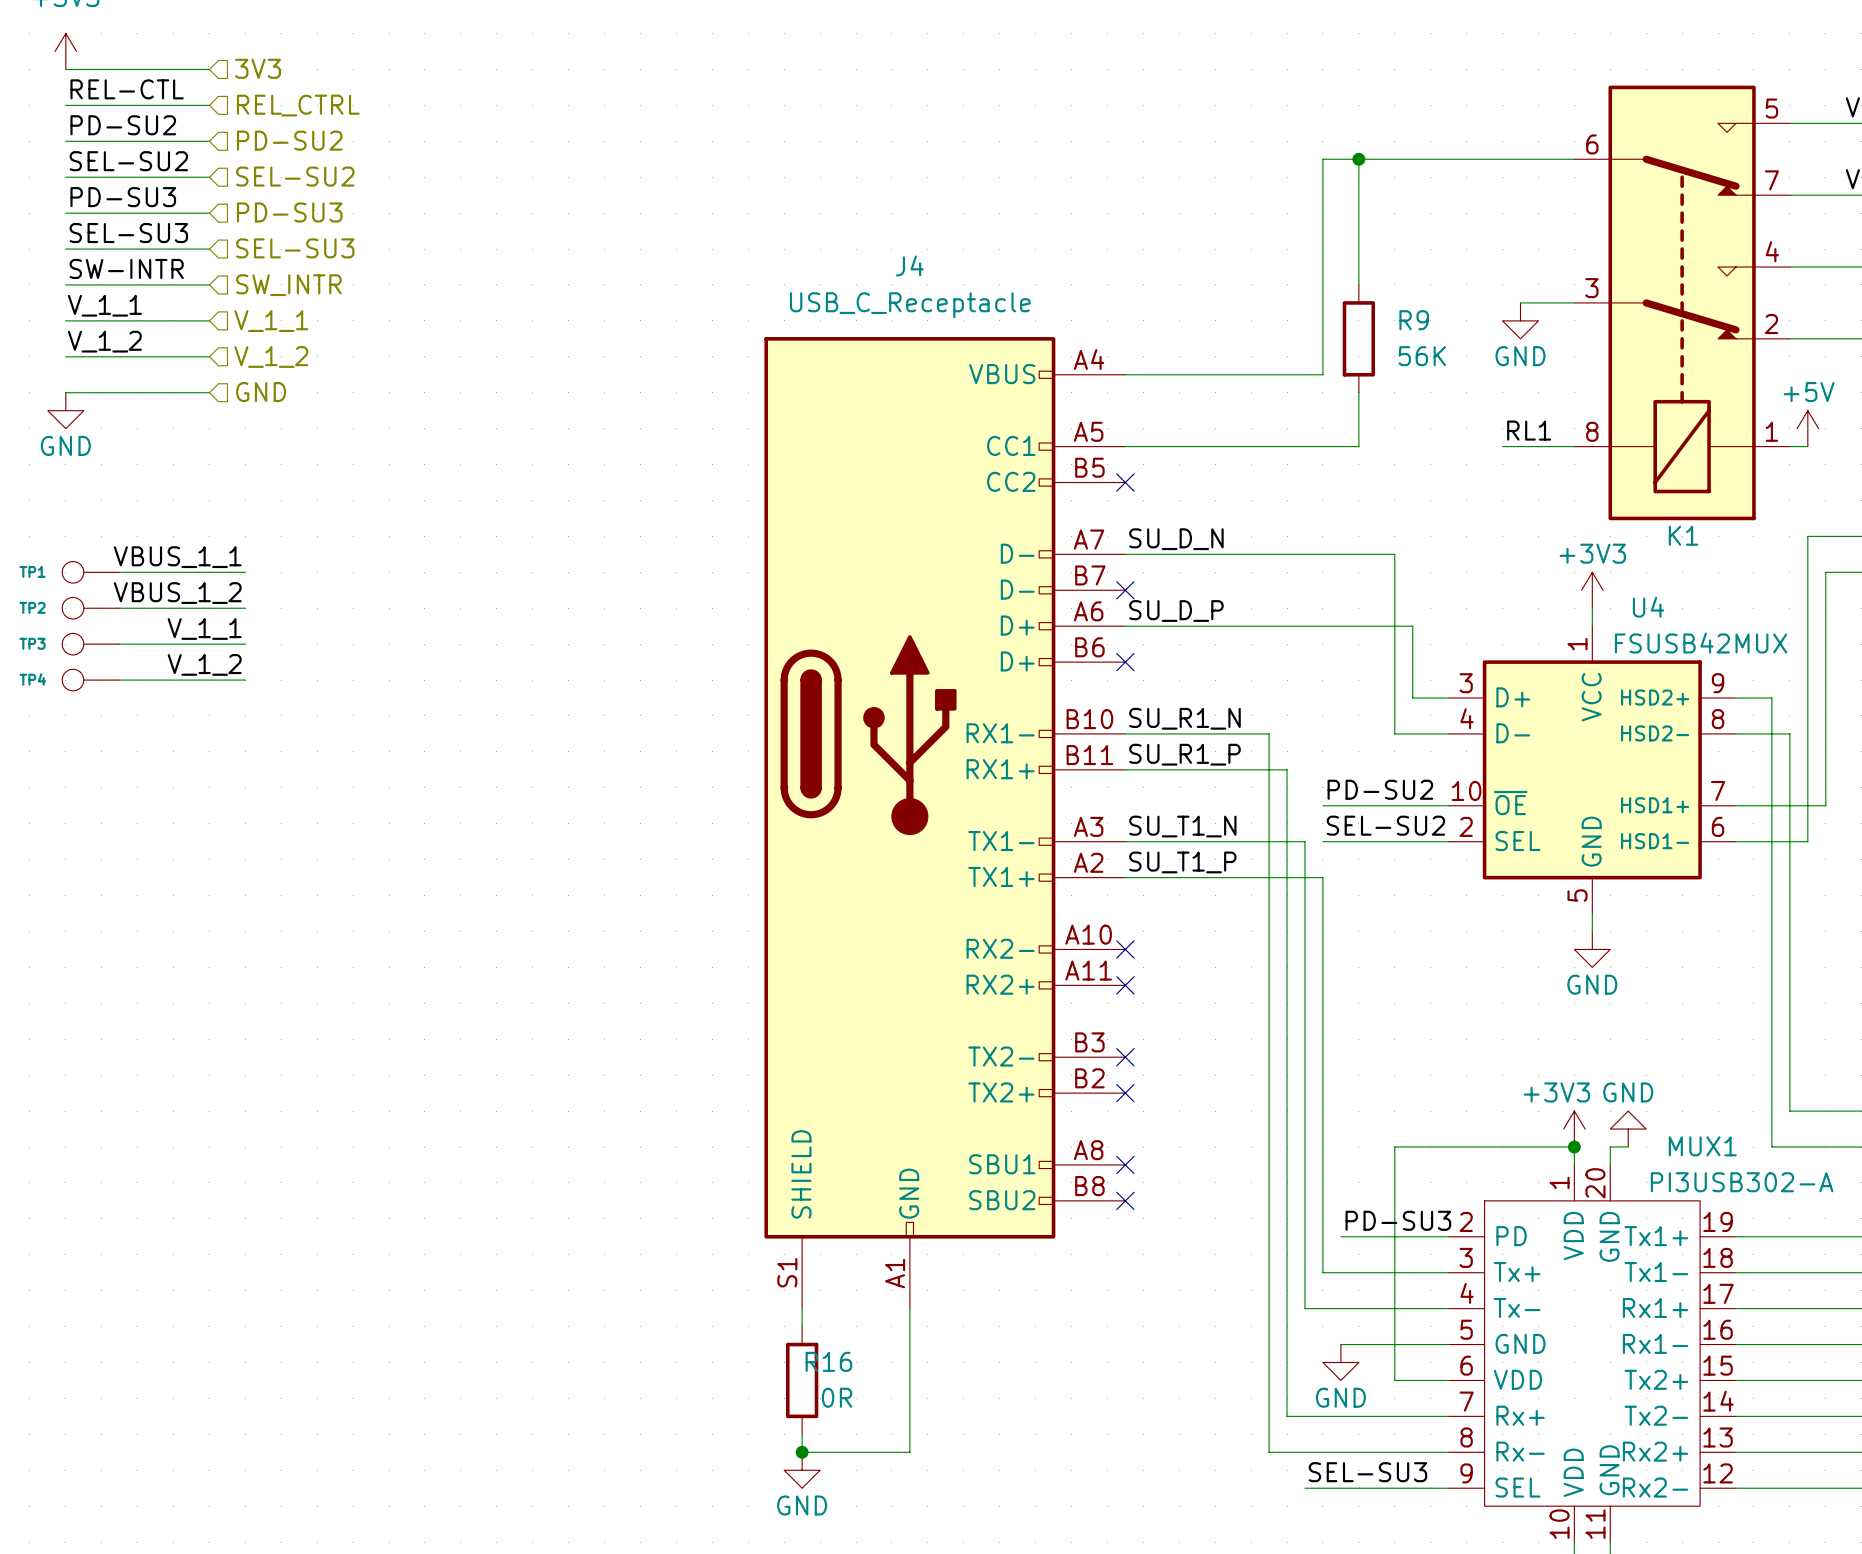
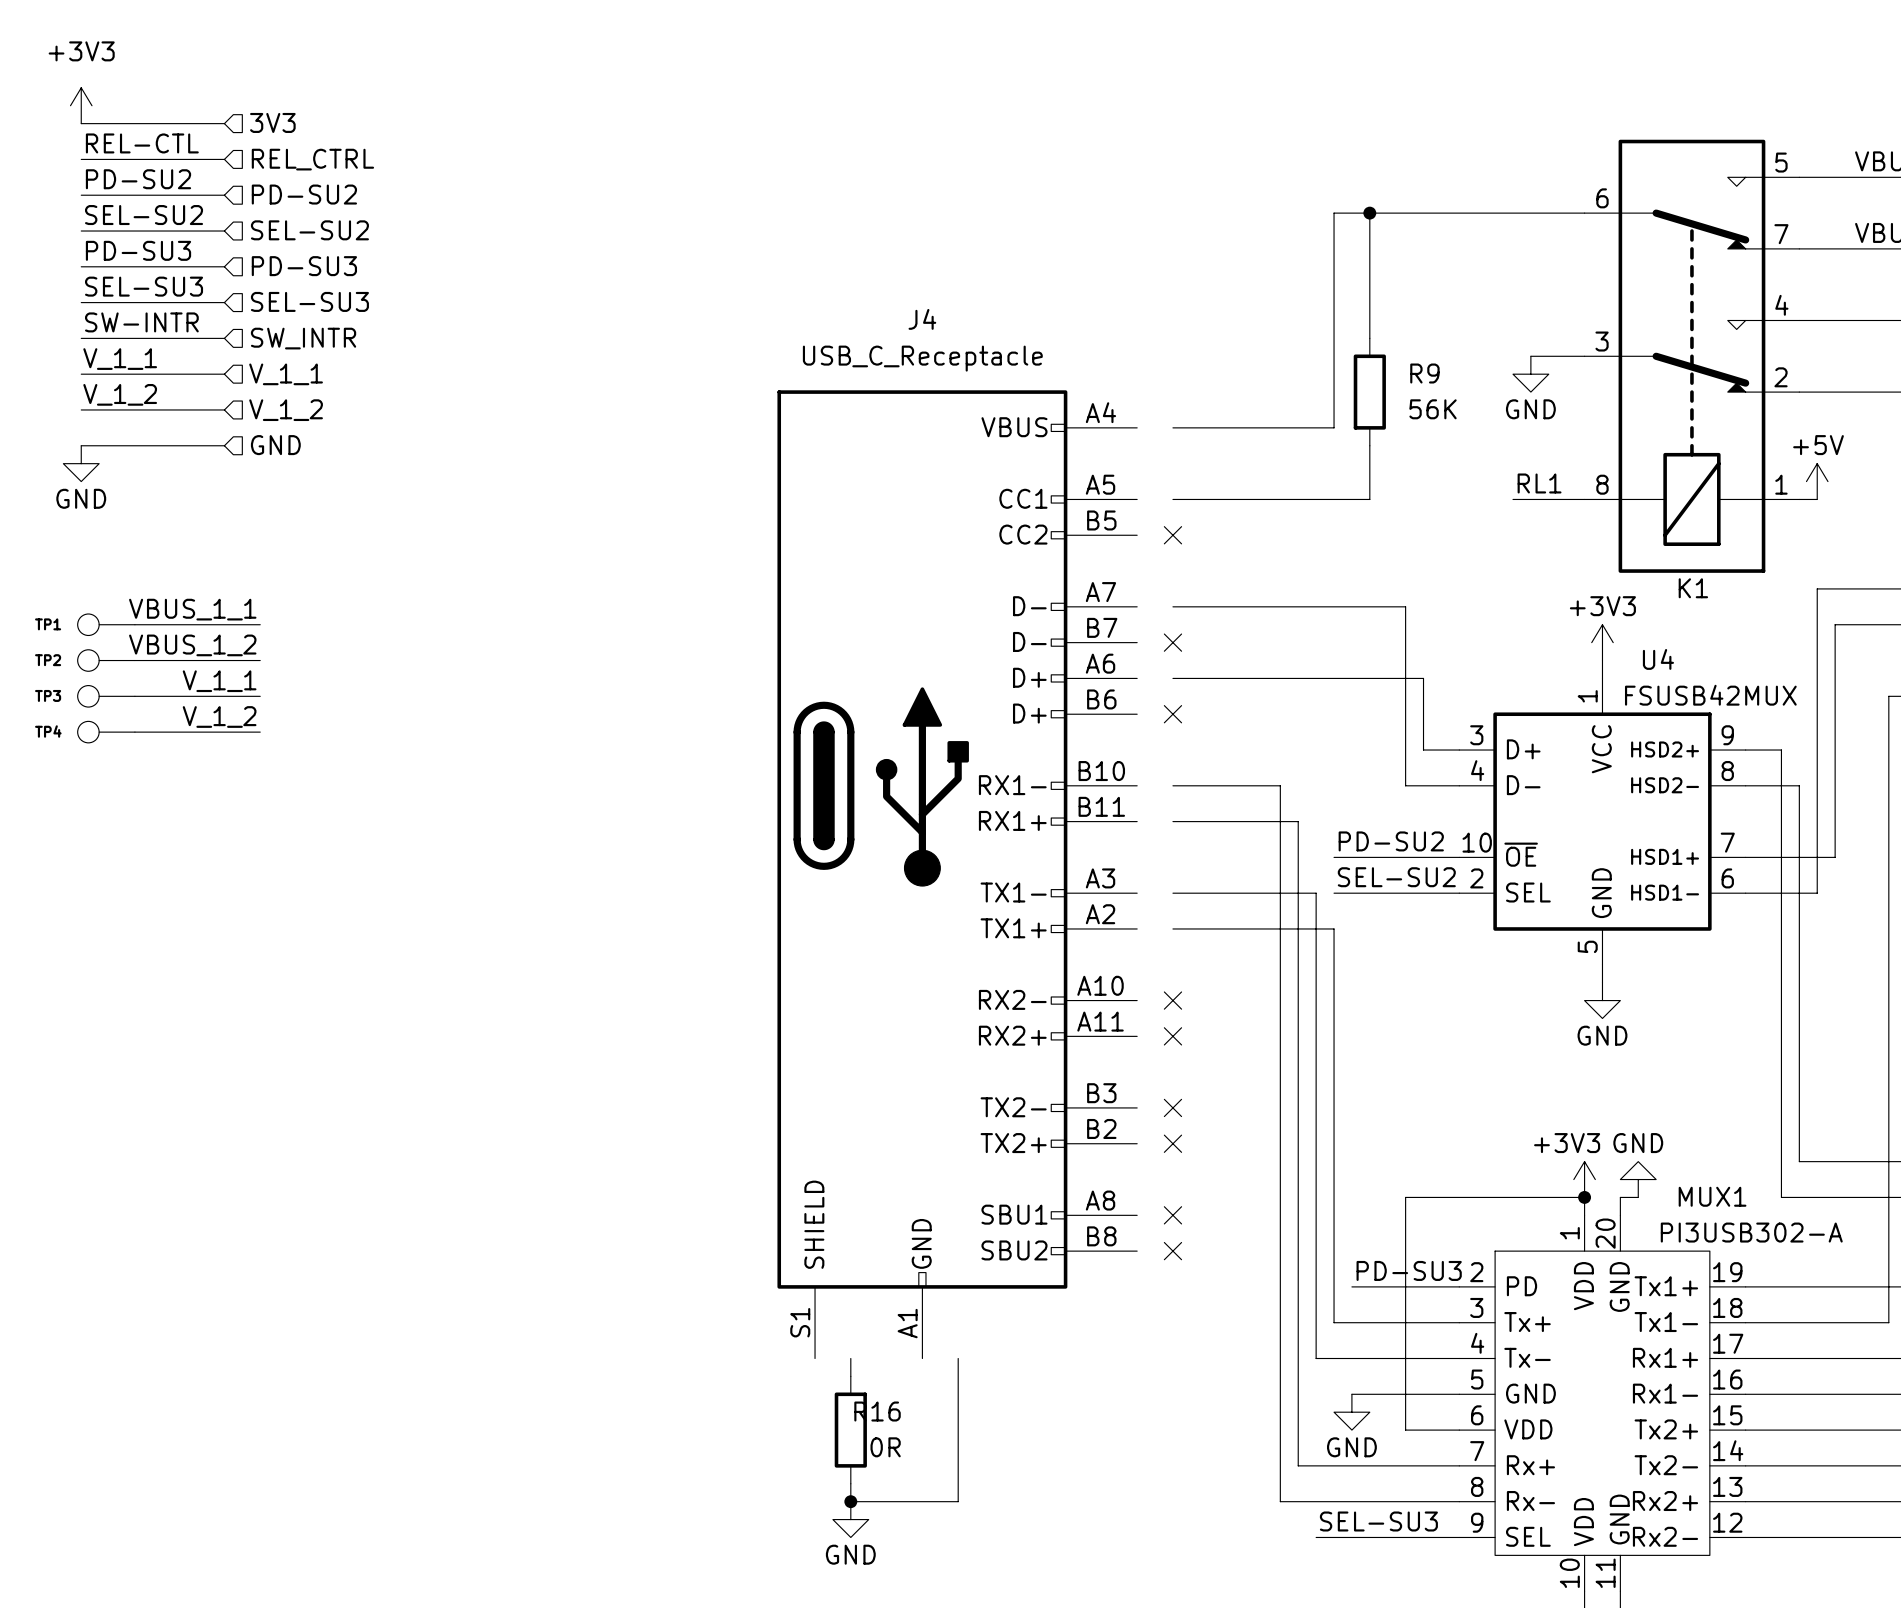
wire: (1125, 374) (1161, 374) -> none
wire: (1125, 446) (1161, 446) -> none
no-connect mark position: (1125, 482) -> (1172, 535)
label: SU_D_N (1176, 539) -> none
wire: (1125, 554) (1161, 554) -> none
no-connect mark position: (1125, 590) -> (1172, 642)
label: SU_D_P (1176, 611) -> none
wire: (1125, 626) (1161, 626) -> none
no-connect mark position: (1125, 662) -> (1172, 714)
label: SU_R1_N (1184, 718) -> none
wire: (1125, 733) (1161, 733) -> none
label: SU_R1_P (1184, 754) -> none
wire: (1125, 769) (1161, 769) -> none
label: SU_T1_N (1182, 826) -> none
wire: (1125, 841) (1161, 841) -> none
label: SU_T1_P (1182, 862) -> none
wire: (1125, 877) (1161, 877) -> none
no-connect mark: (1125, 949) -> none
no-connect mark: none -> (1172, 1000)
no-connect mark: (1125, 985) -> none
no-connect mark: none -> (1172, 1036)
no-connect mark: (1125, 1057) -> none
no-connect mark: none -> (1172, 1107)
no-connect mark: (1125, 1093) -> none
no-connect mark: none -> (1172, 1143)
no-connect mark: (1125, 1164) -> none
no-connect mark: none -> (1172, 1215)
no-connect mark: (1125, 1200) -> none
no-connect mark: none -> (1172, 1251)
wire: (802, 1308) (802, 1326) -> (850, 1358) (850, 1376)
wire: (909, 1308) (909, 1452) -> (958, 1358) (958, 1501) (922, 1501)
R16 position: (802, 1380) -> (850, 1430)
wire: (802, 1434) (802, 1452) (838, 1452) -> (850, 1483) (850, 1501)
junction position: (802, 1452) -> (850, 1501)
power symbol position: GND (802, 1470) -> GND (850, 1519)

